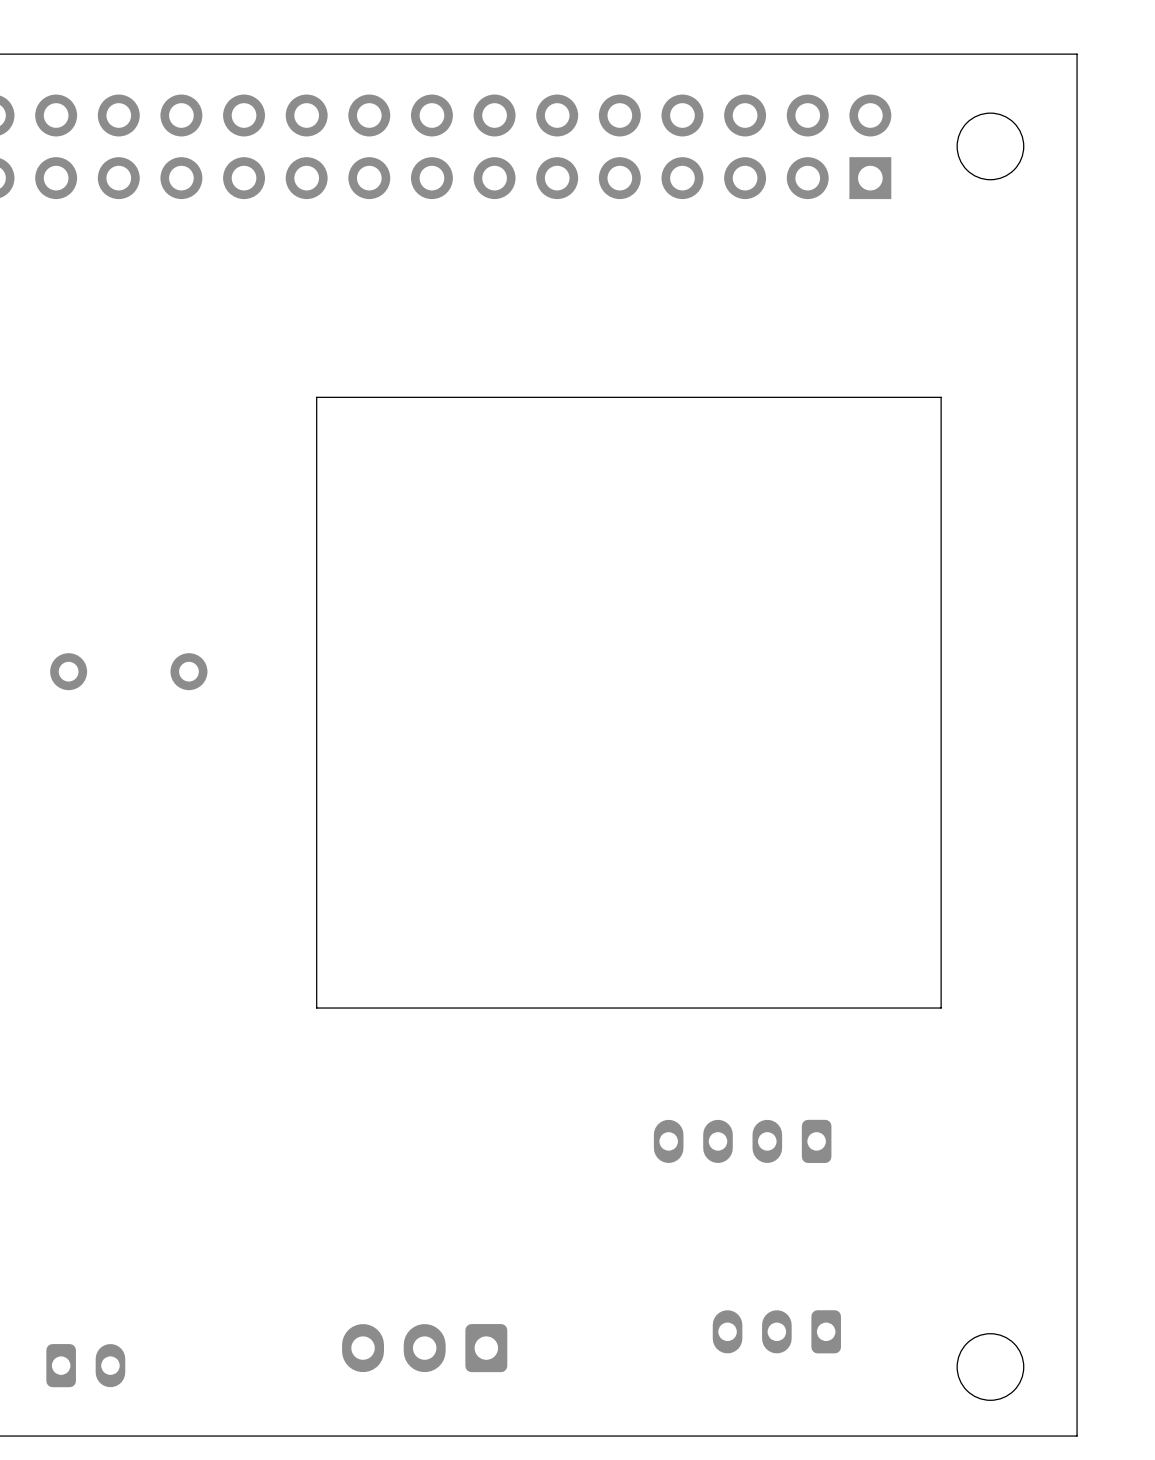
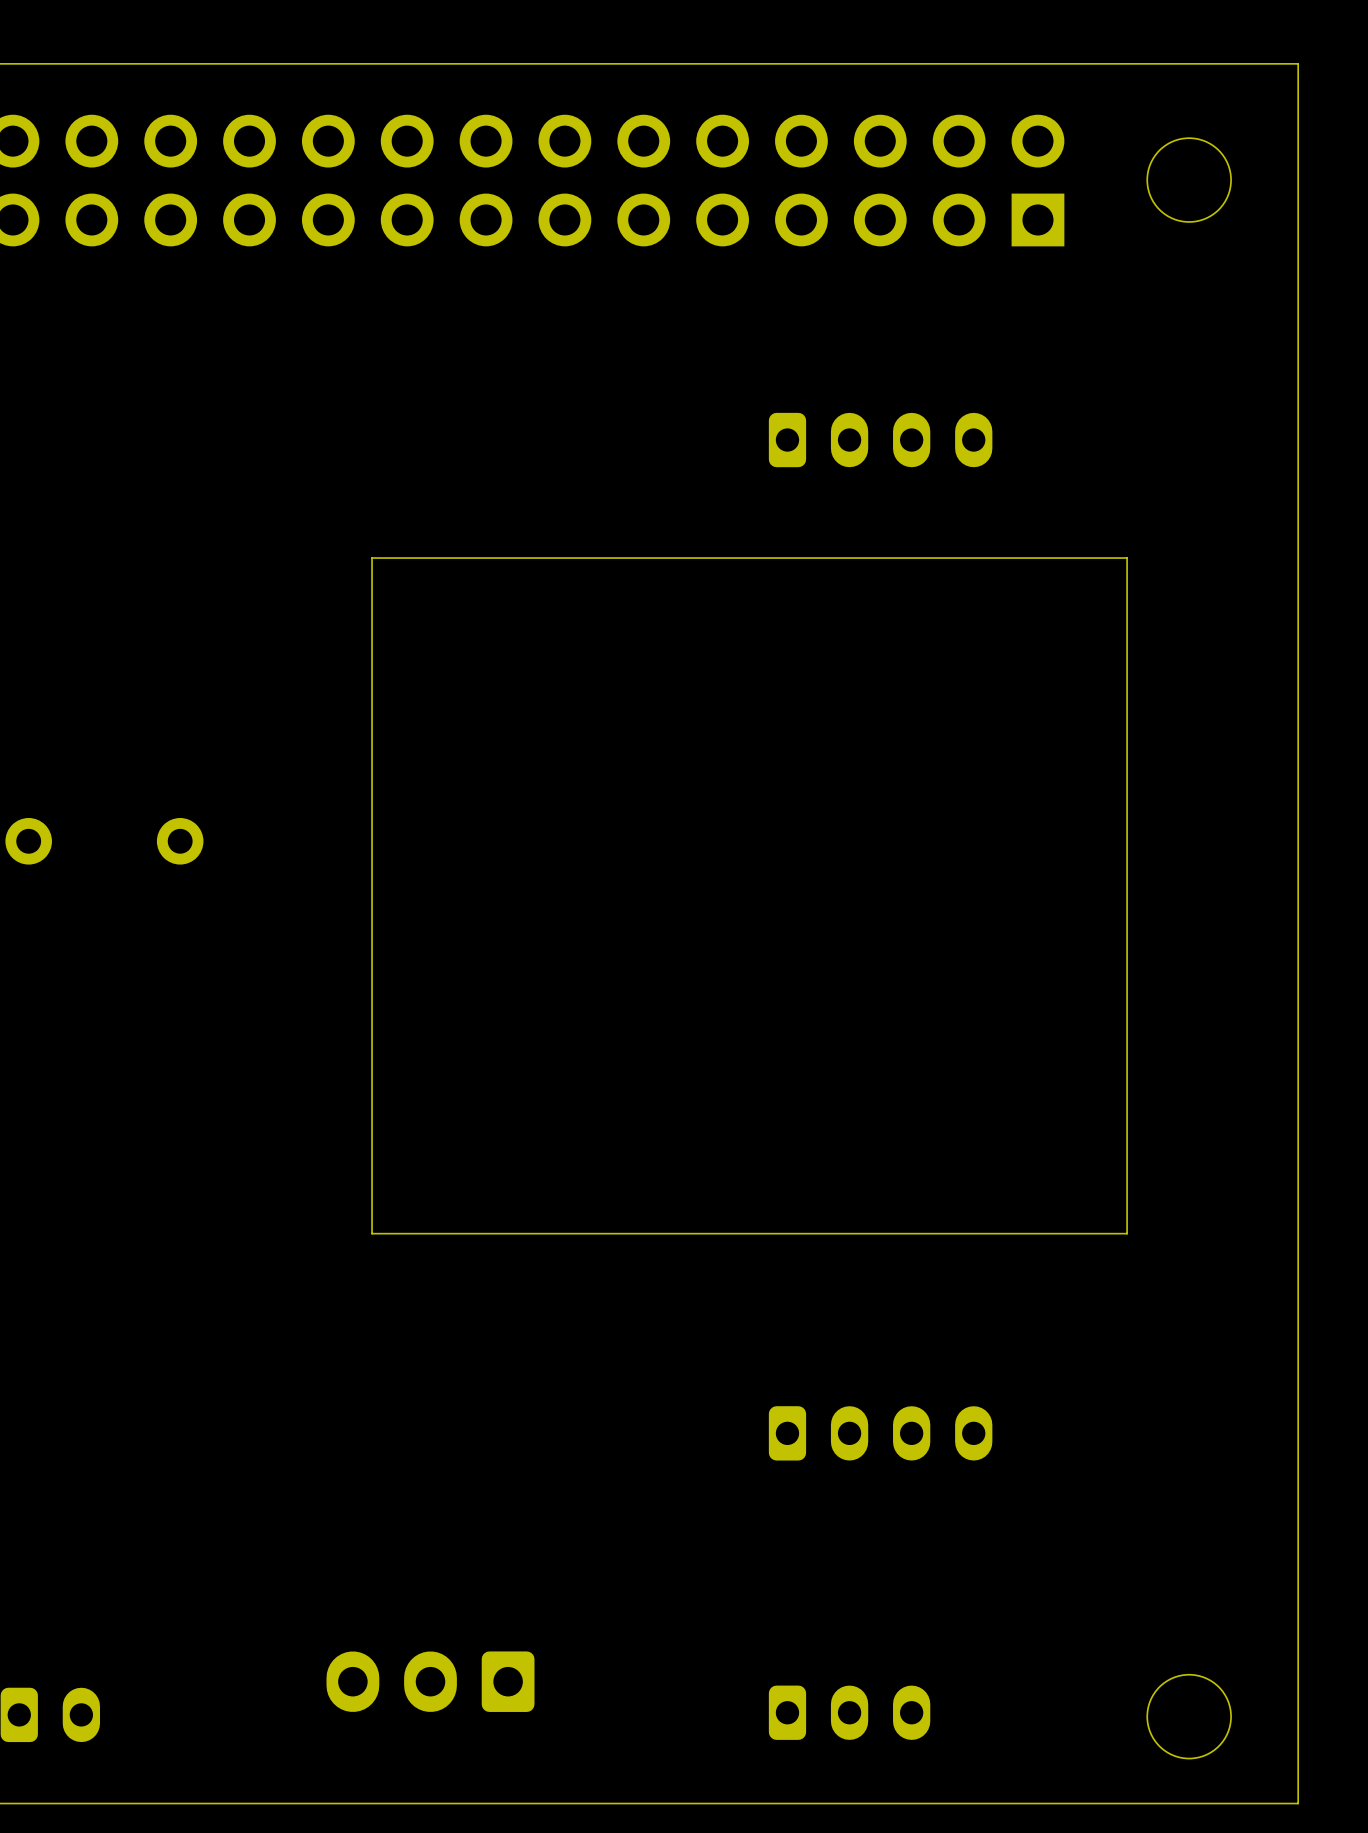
part: none -> (880, 440)
board edge: (941, 446) (941, 397) (316, 397) (316, 1008) (941, 1008) (941, 983) -> (1127, 558) (372, 558) (372, 1233) (1127, 1233)
part rotation: 0° (742, 1141) -> 180° (880, 1433)
part rotation: 0° (776, 1331) -> 180° (849, 1712)
part position: (424, 1348) -> (430, 1681)

